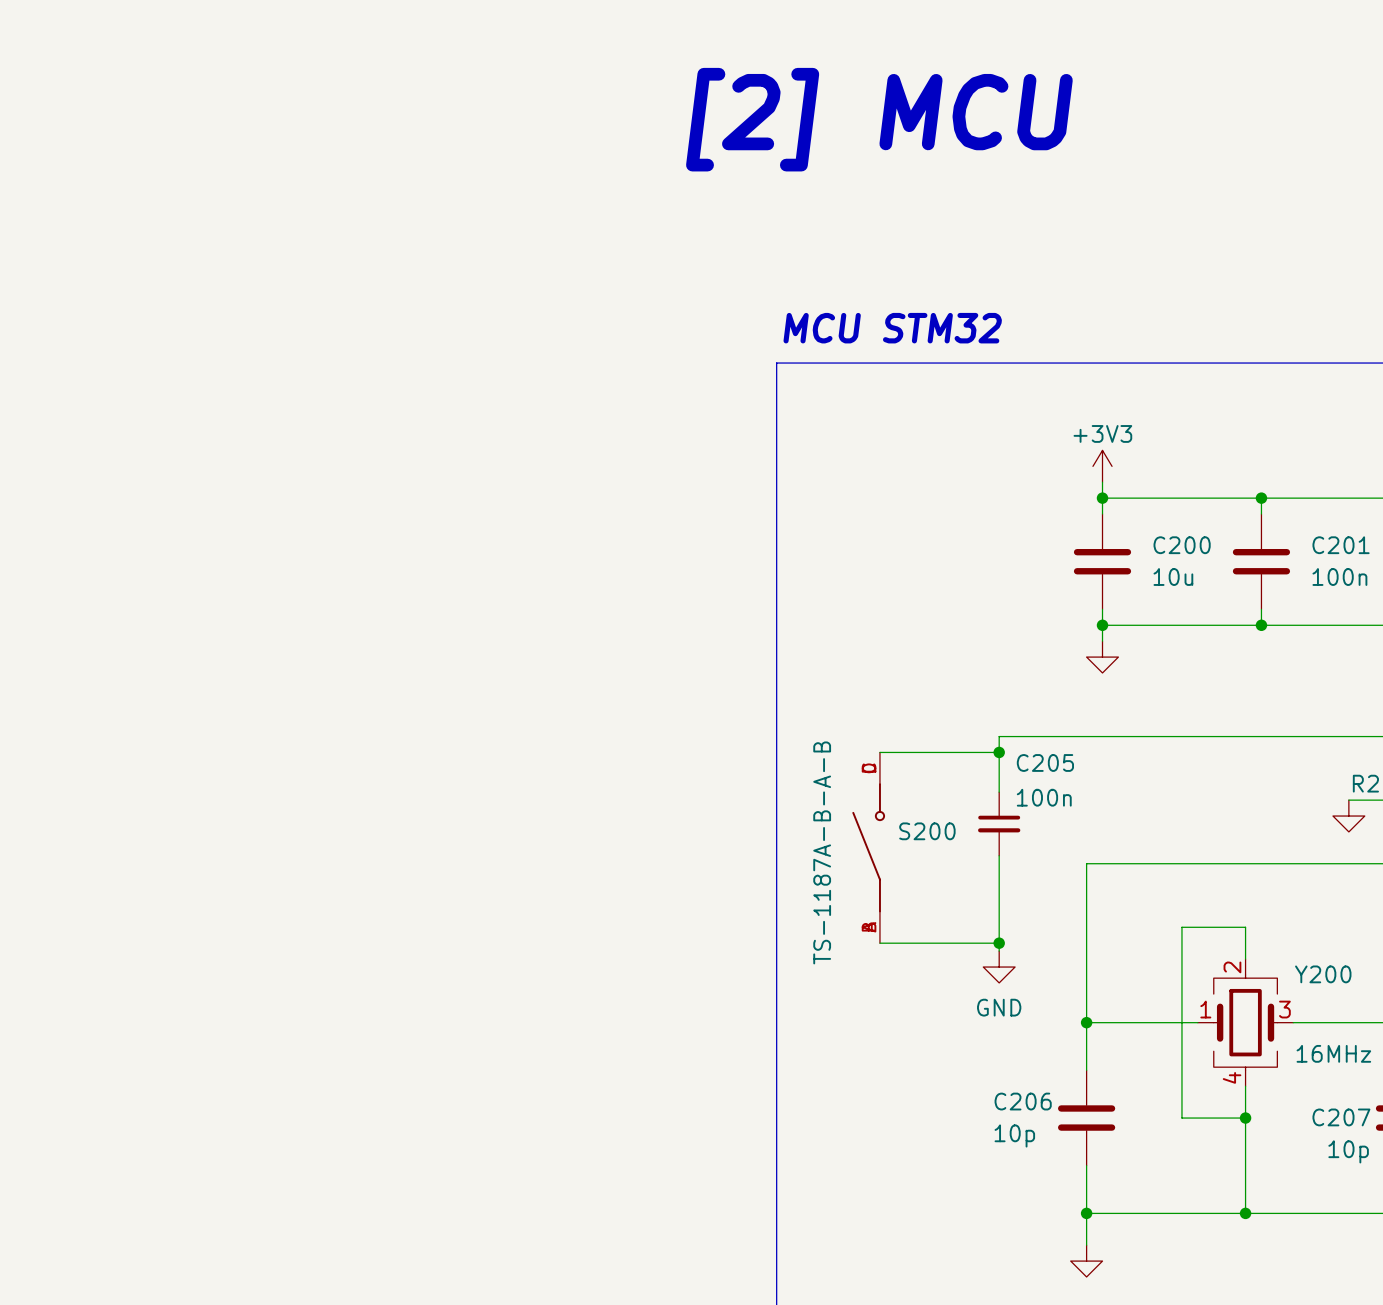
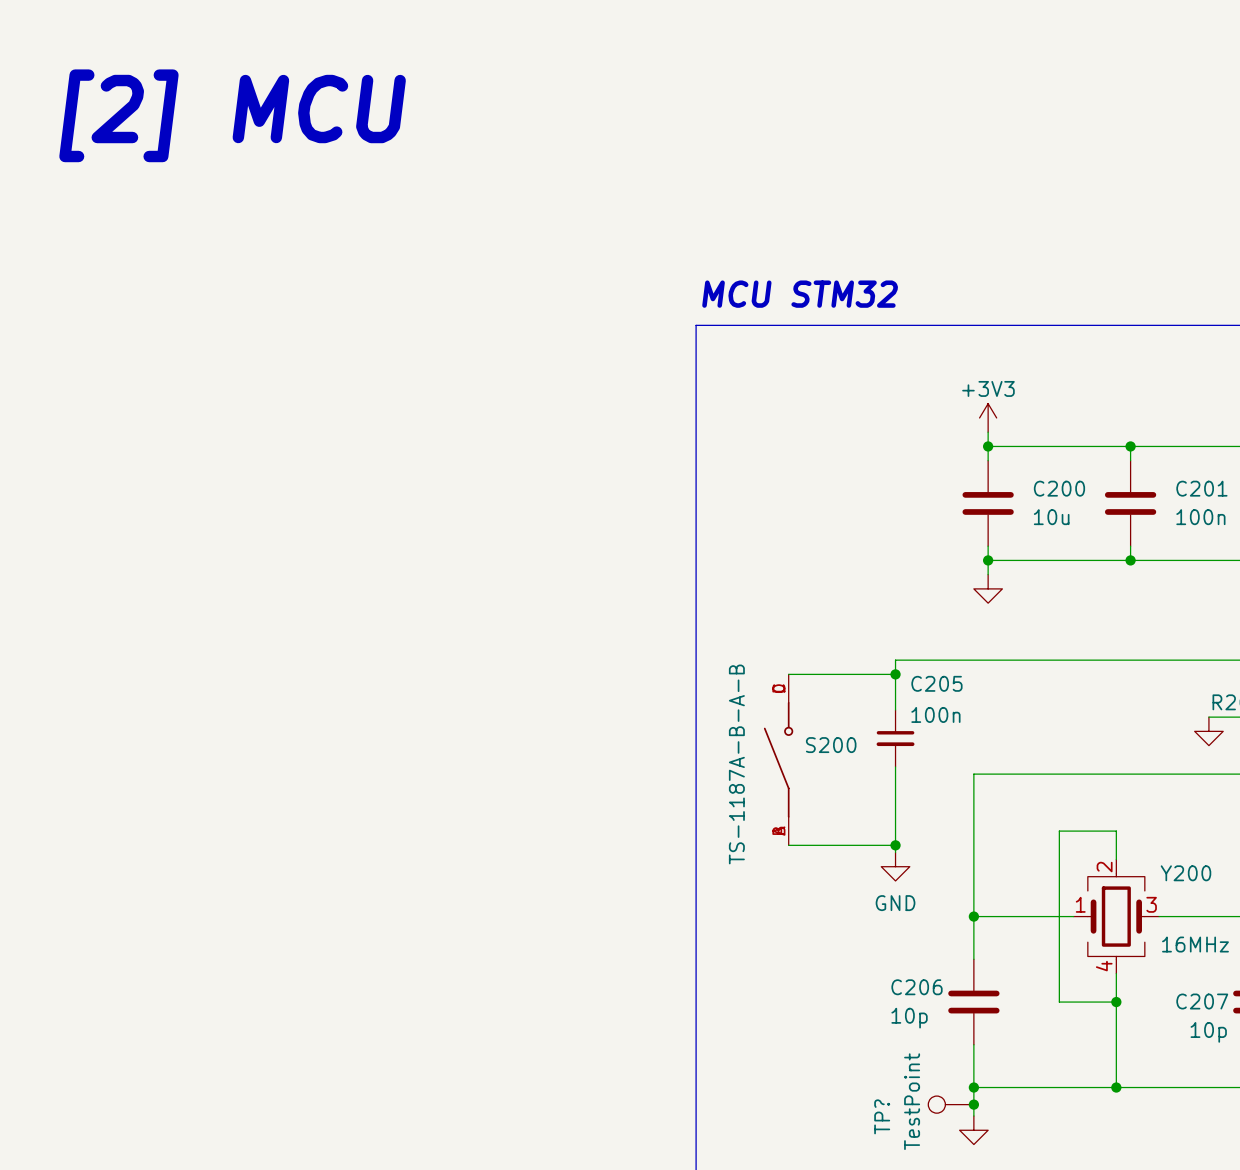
text: [2] MCU (879, 119) -> none
text: none -> [2] MCU (232, 115)
TP?: none -> TestPoint (951, 1104)
junction: none -> (973, 1104)

